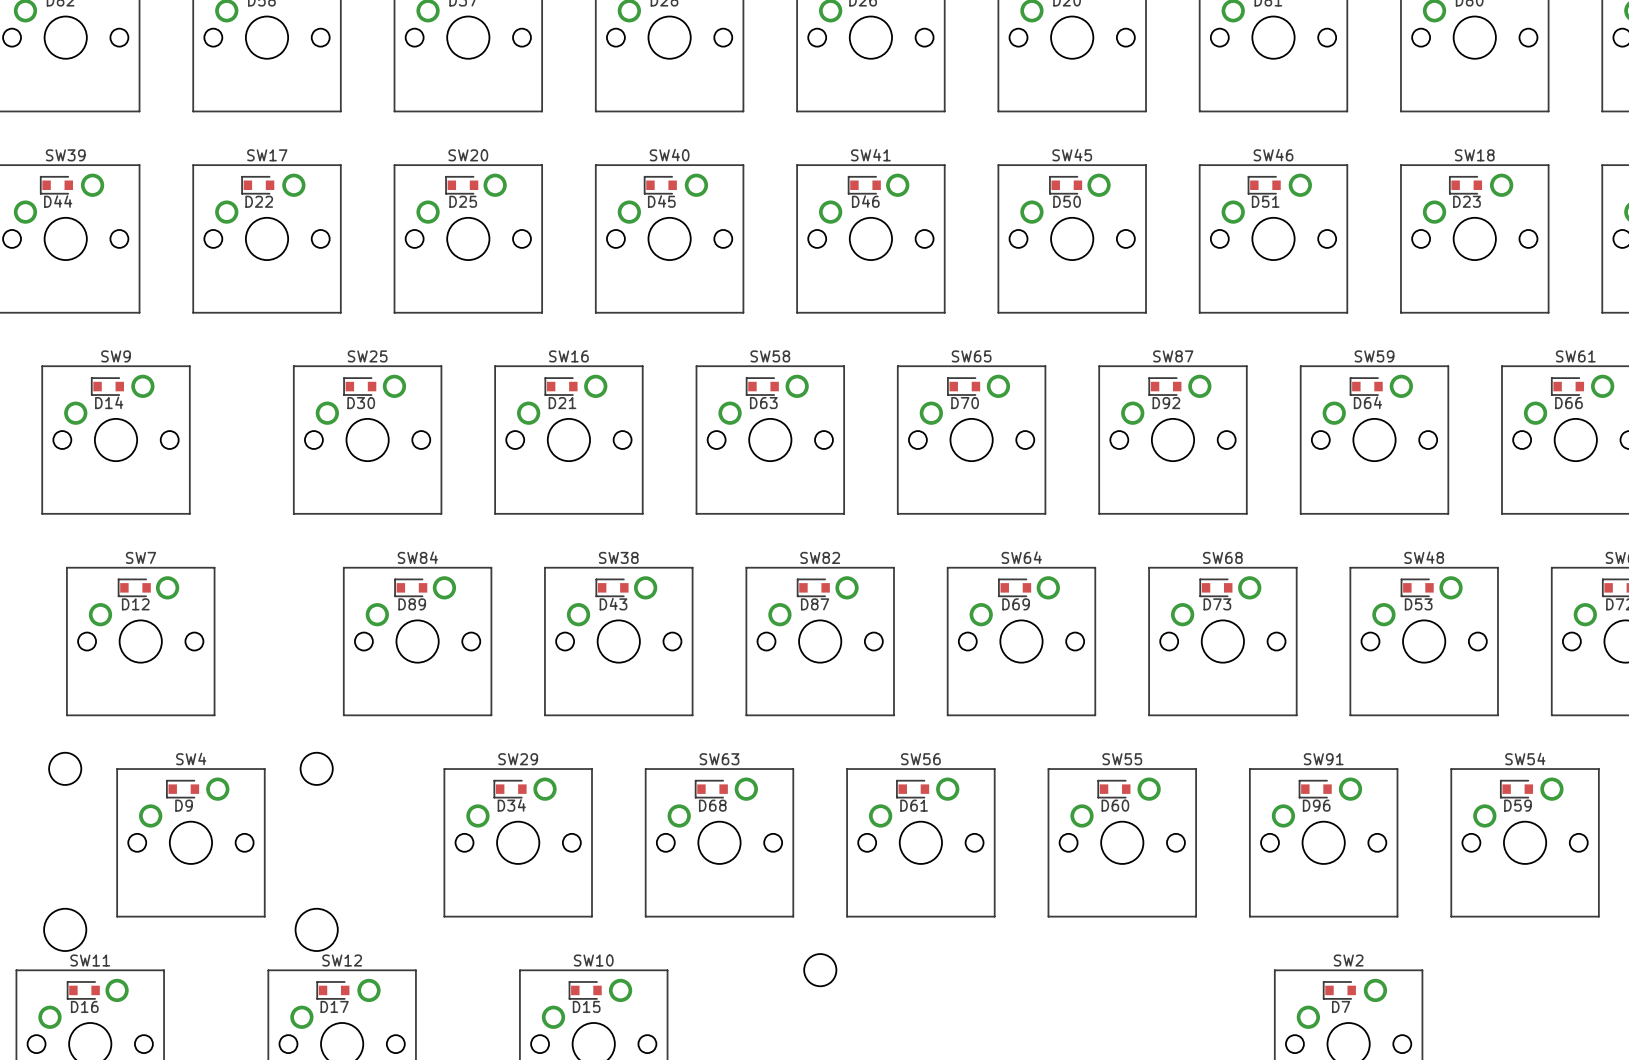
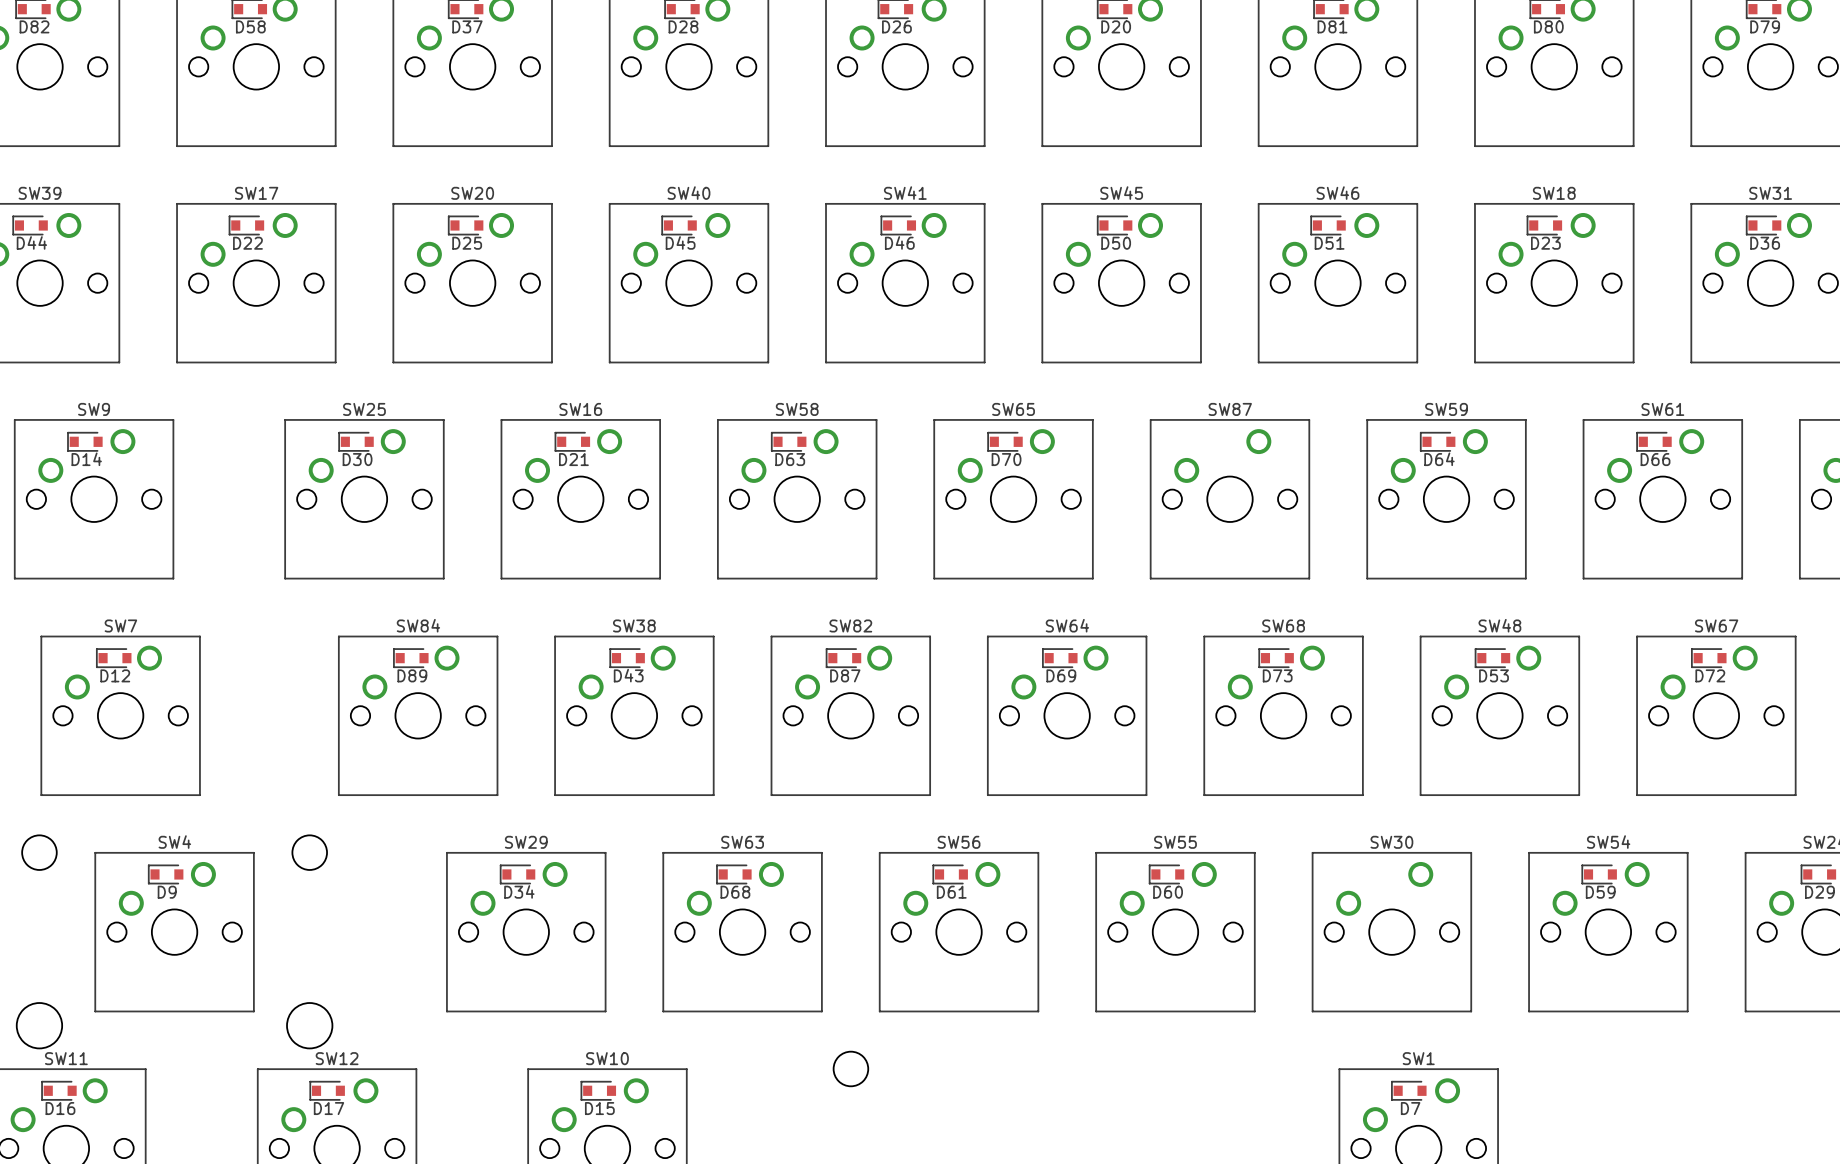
D92: (1165, 386) -> none
SW91 name: SW91 (1323, 759) -> SW30 (1391, 842)
D96: (1315, 789) -> none
SW2 name: SW2 (1348, 960) -> SW1 (1418, 1058)

